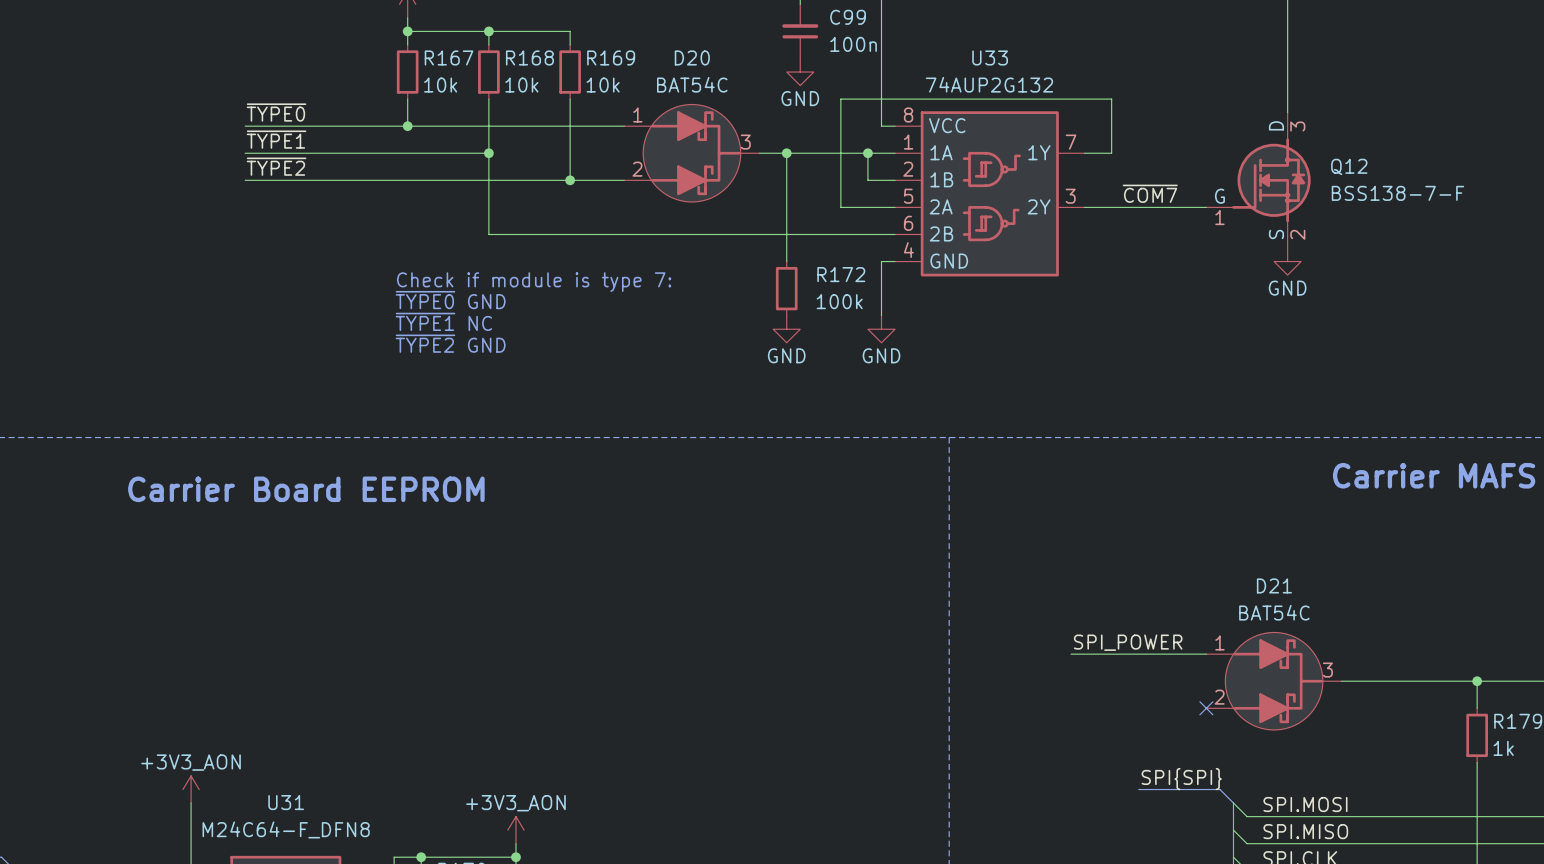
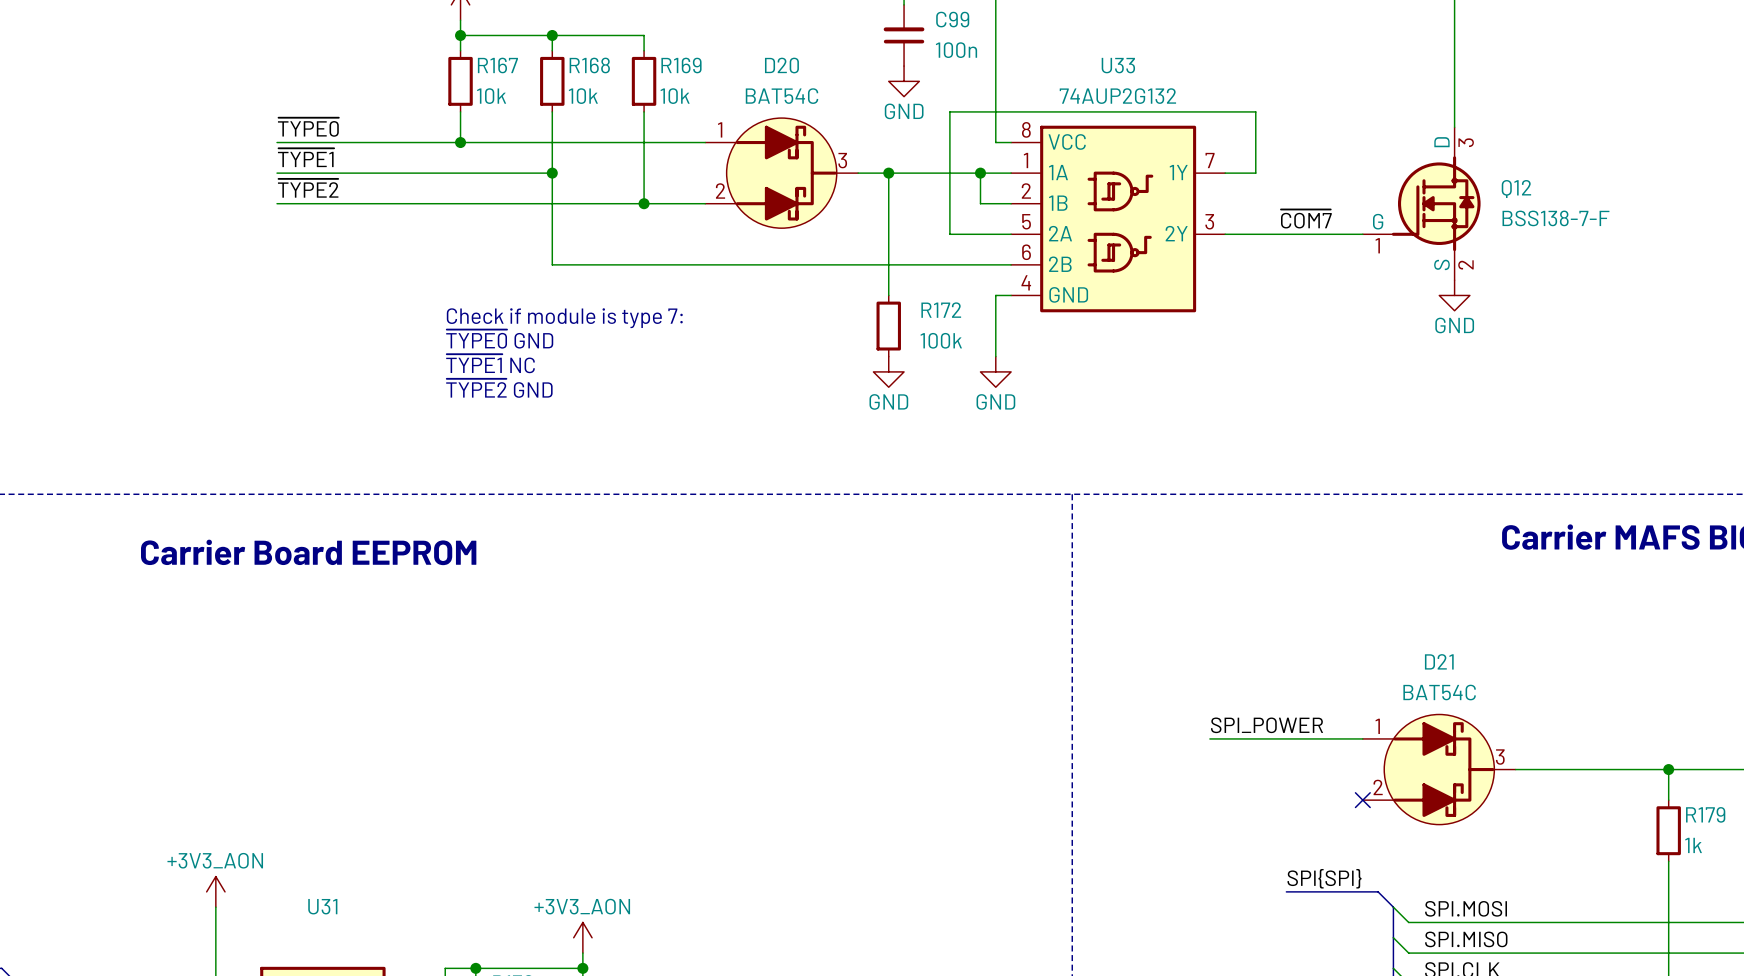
U31 value: M24C64-F_DFN8 (286, 829) -> none

